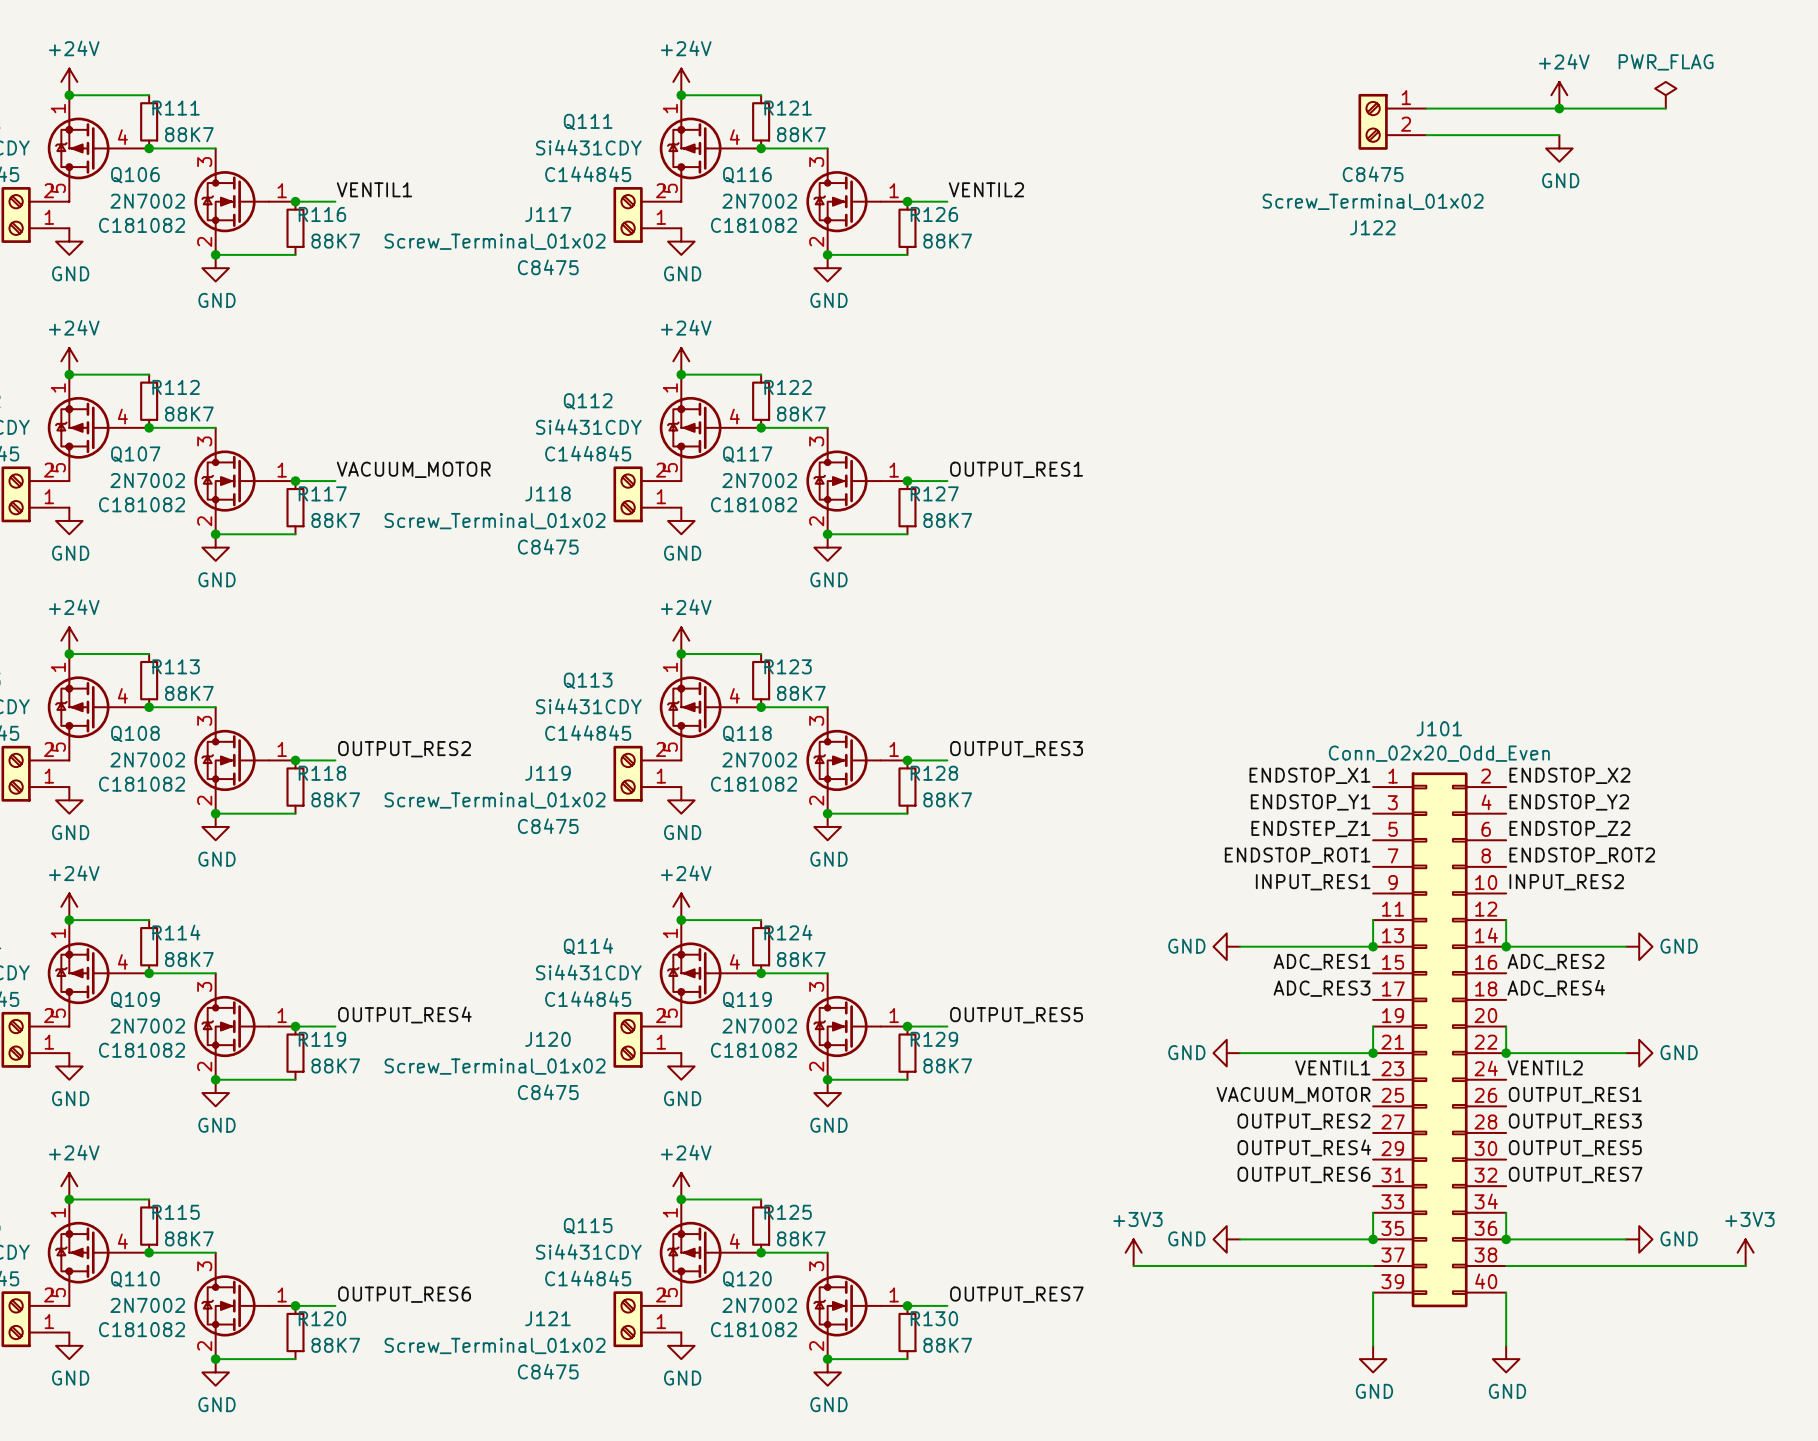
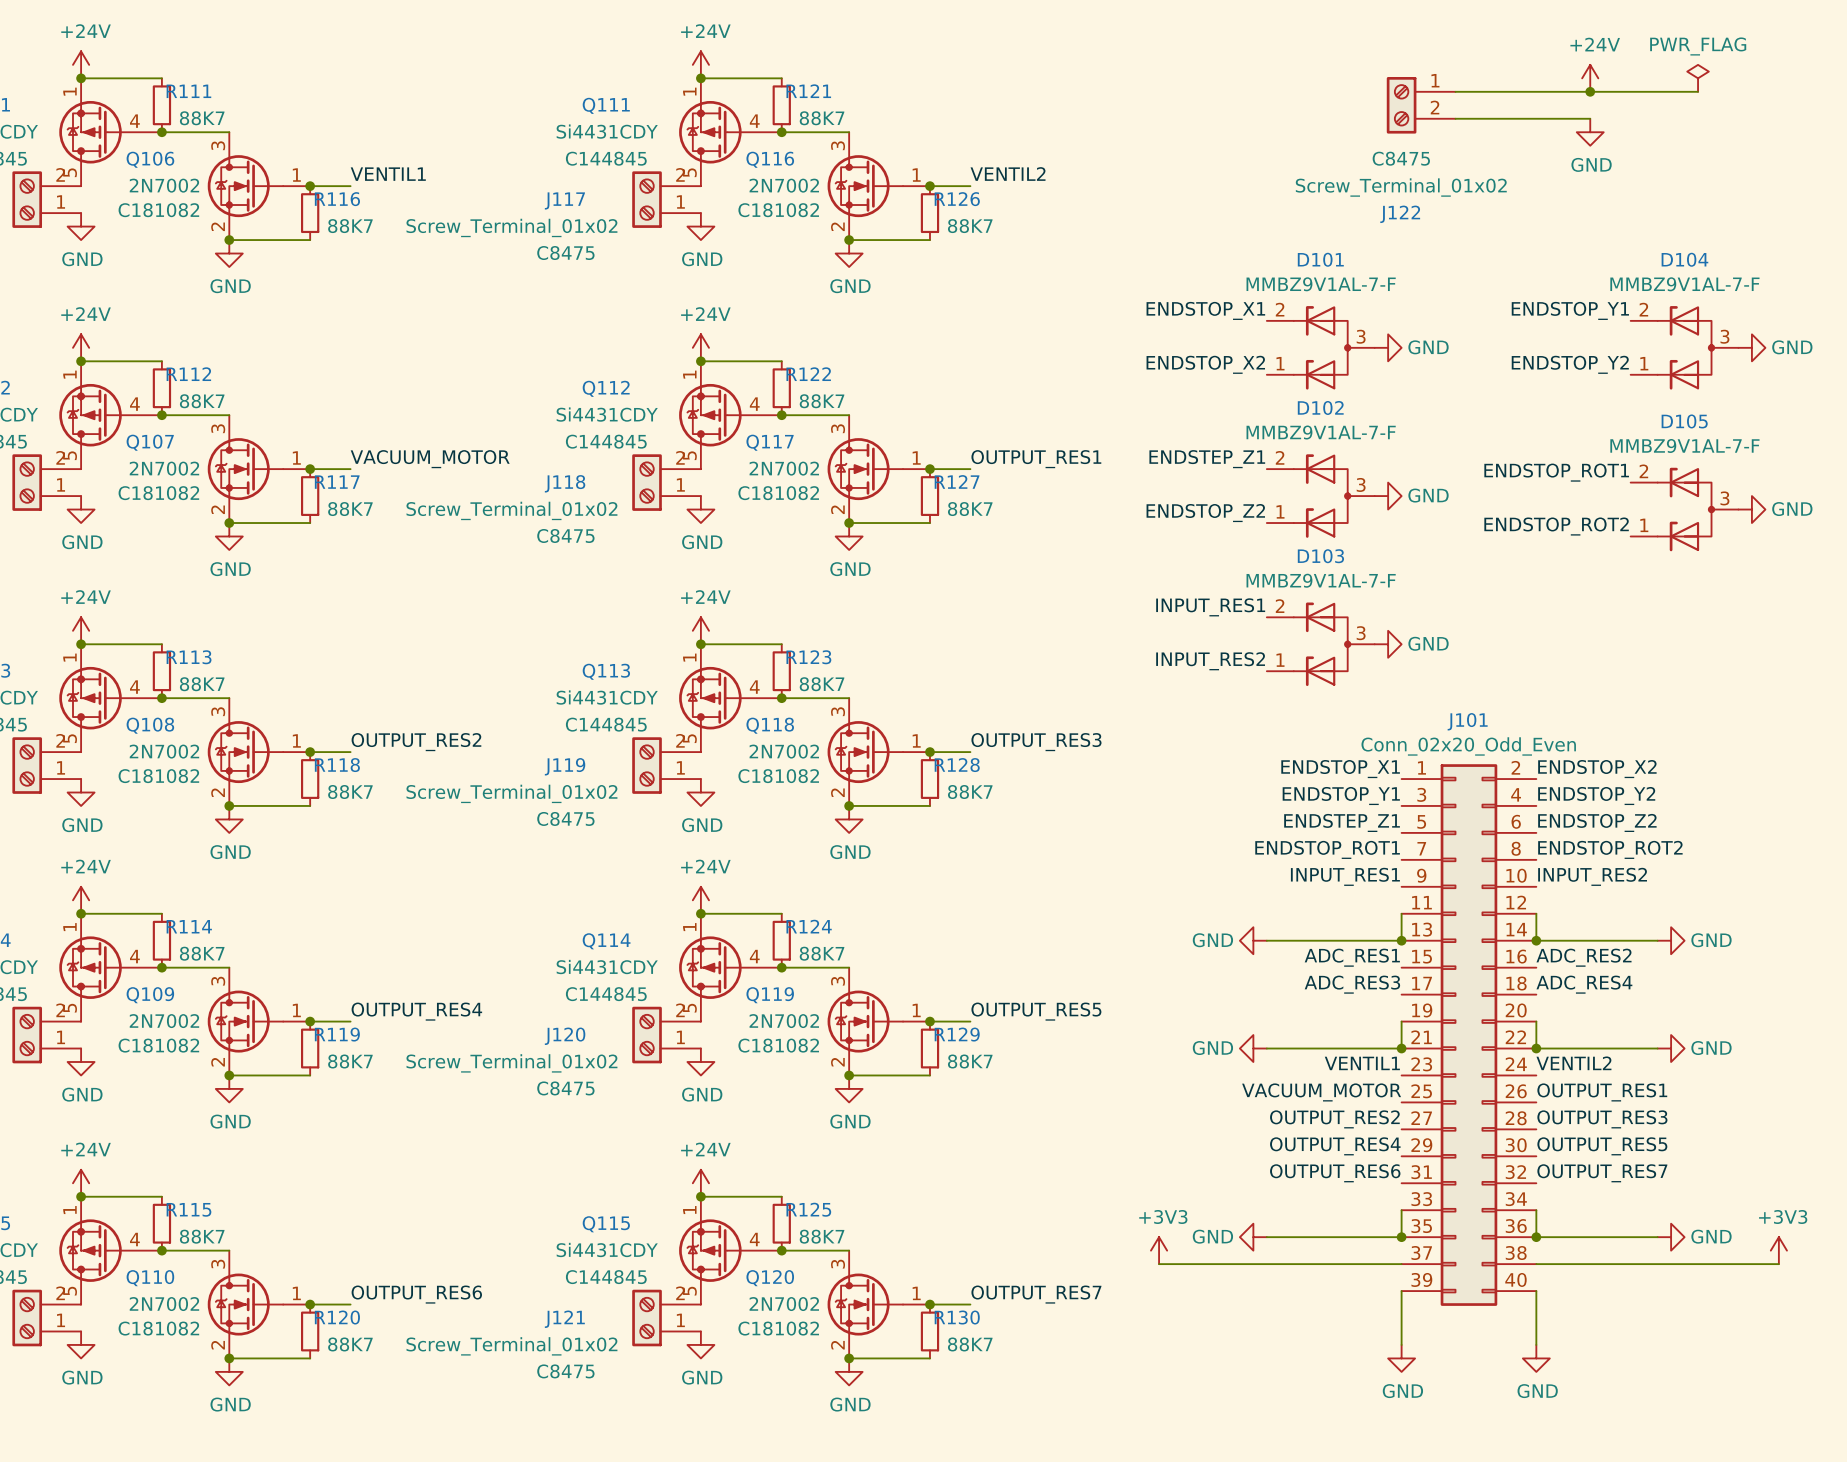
label: none -> ENDSTOP_X1 (1205, 310)
label: none -> ENDSTOP_Y1 (1570, 310)
D101: none -> MMBZ9V1AL-7-F (1320, 347)
power symbol: none -> GND (1388, 347)
D104: none -> MMBZ9V1AL-7-F (1684, 347)
power symbol: none -> GND (1751, 347)
label: none -> ENDSTOP_X2 (1205, 364)
label: none -> ENDSTOP_Y2 (1570, 364)
label: none -> ENDSTEP_Z1 (1207, 459)
label: none -> ENDSTOP_ROT1 (1556, 472)
D102: none -> MMBZ9V1AL-7-F (1320, 496)
power symbol: none -> GND (1388, 496)
D105: none -> MMBZ9V1AL-7-F (1684, 509)
power symbol: none -> GND (1751, 509)
label: none -> ENDSTOP_Z2 (1205, 513)
label: none -> ENDSTOP_ROT2 (1556, 526)
label: none -> INPUT_RES1 (1210, 607)
D103: none -> MMBZ9V1AL-7-F (1320, 644)
power symbol: none -> GND (1388, 644)
label: none -> INPUT_RES2 (1210, 661)

